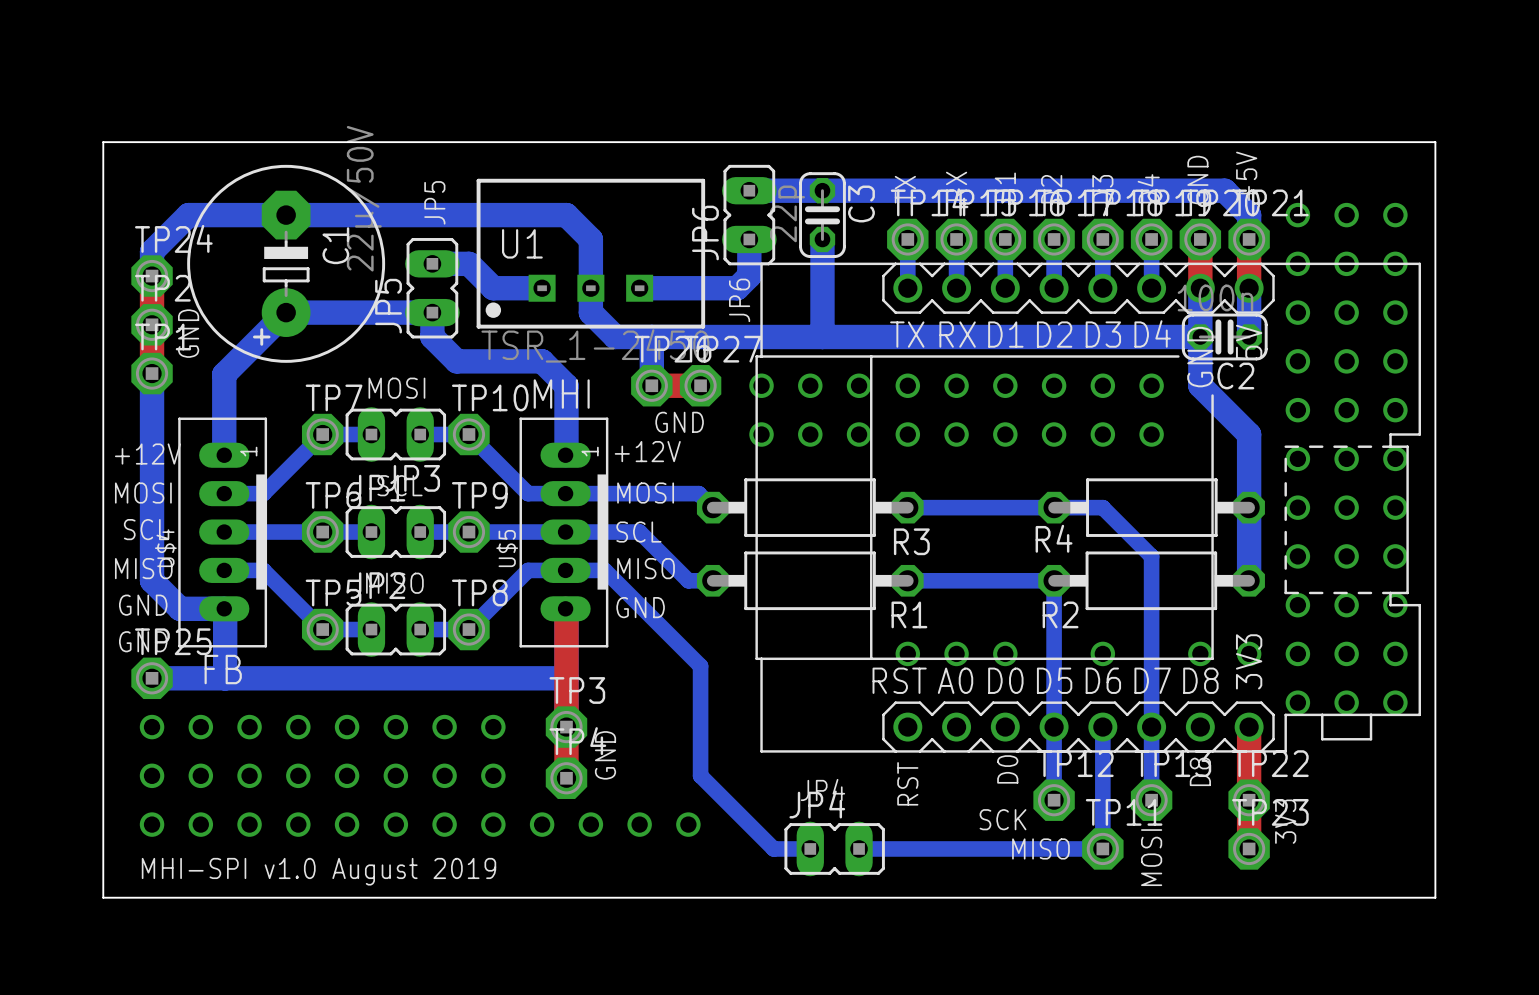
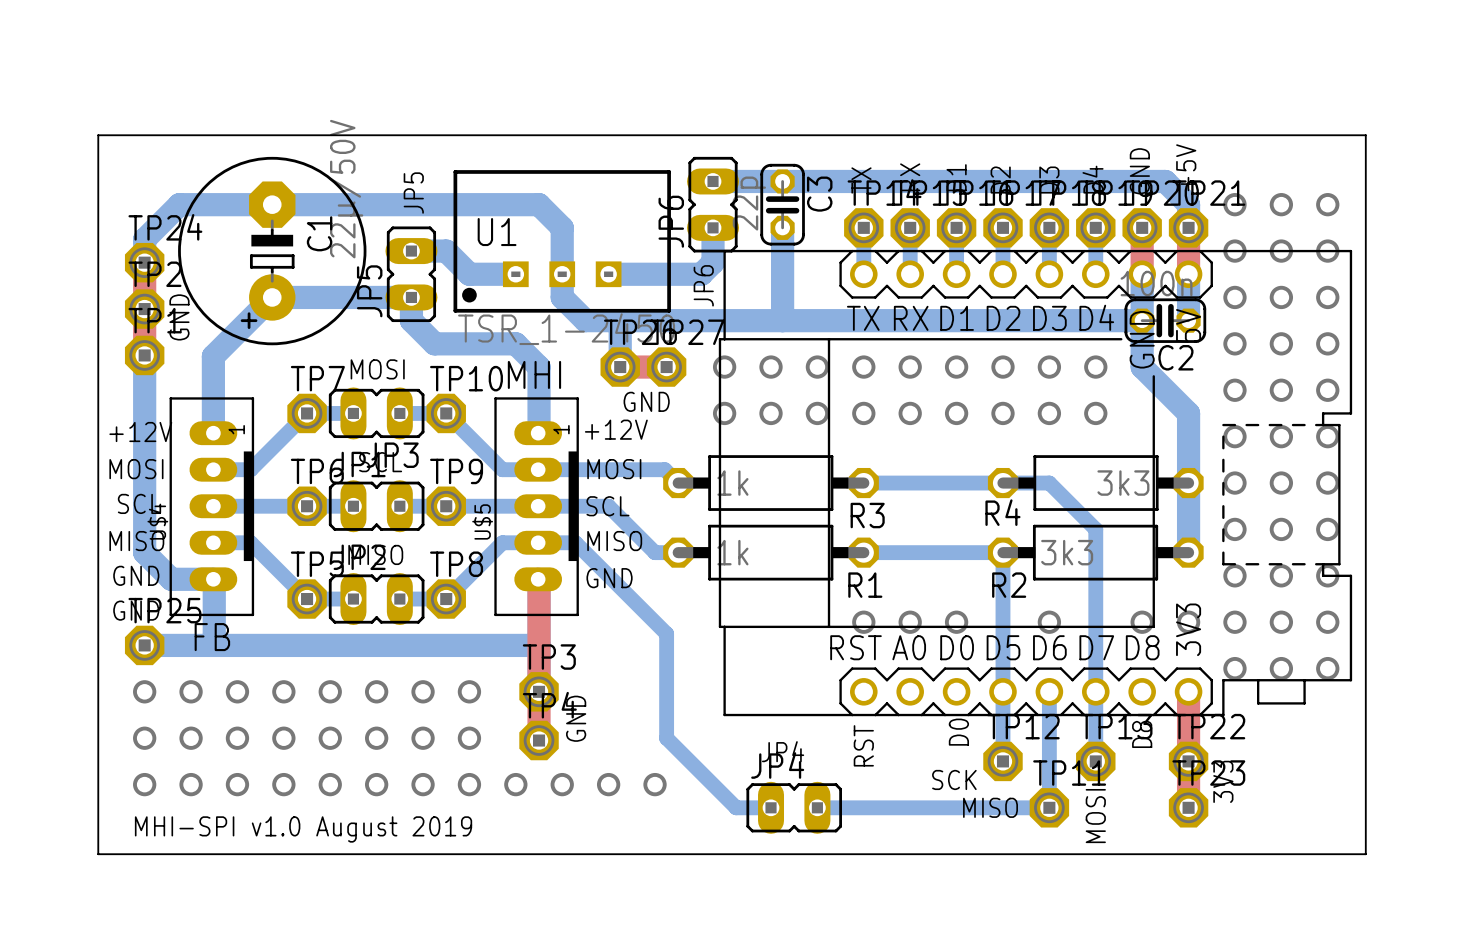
R3 value: none -> 1k (732, 483)
R4 value: none -> 3k3 (1123, 483)
R1 value: none -> 1k (732, 552)
R2 value: none -> 3k3 (1067, 552)

